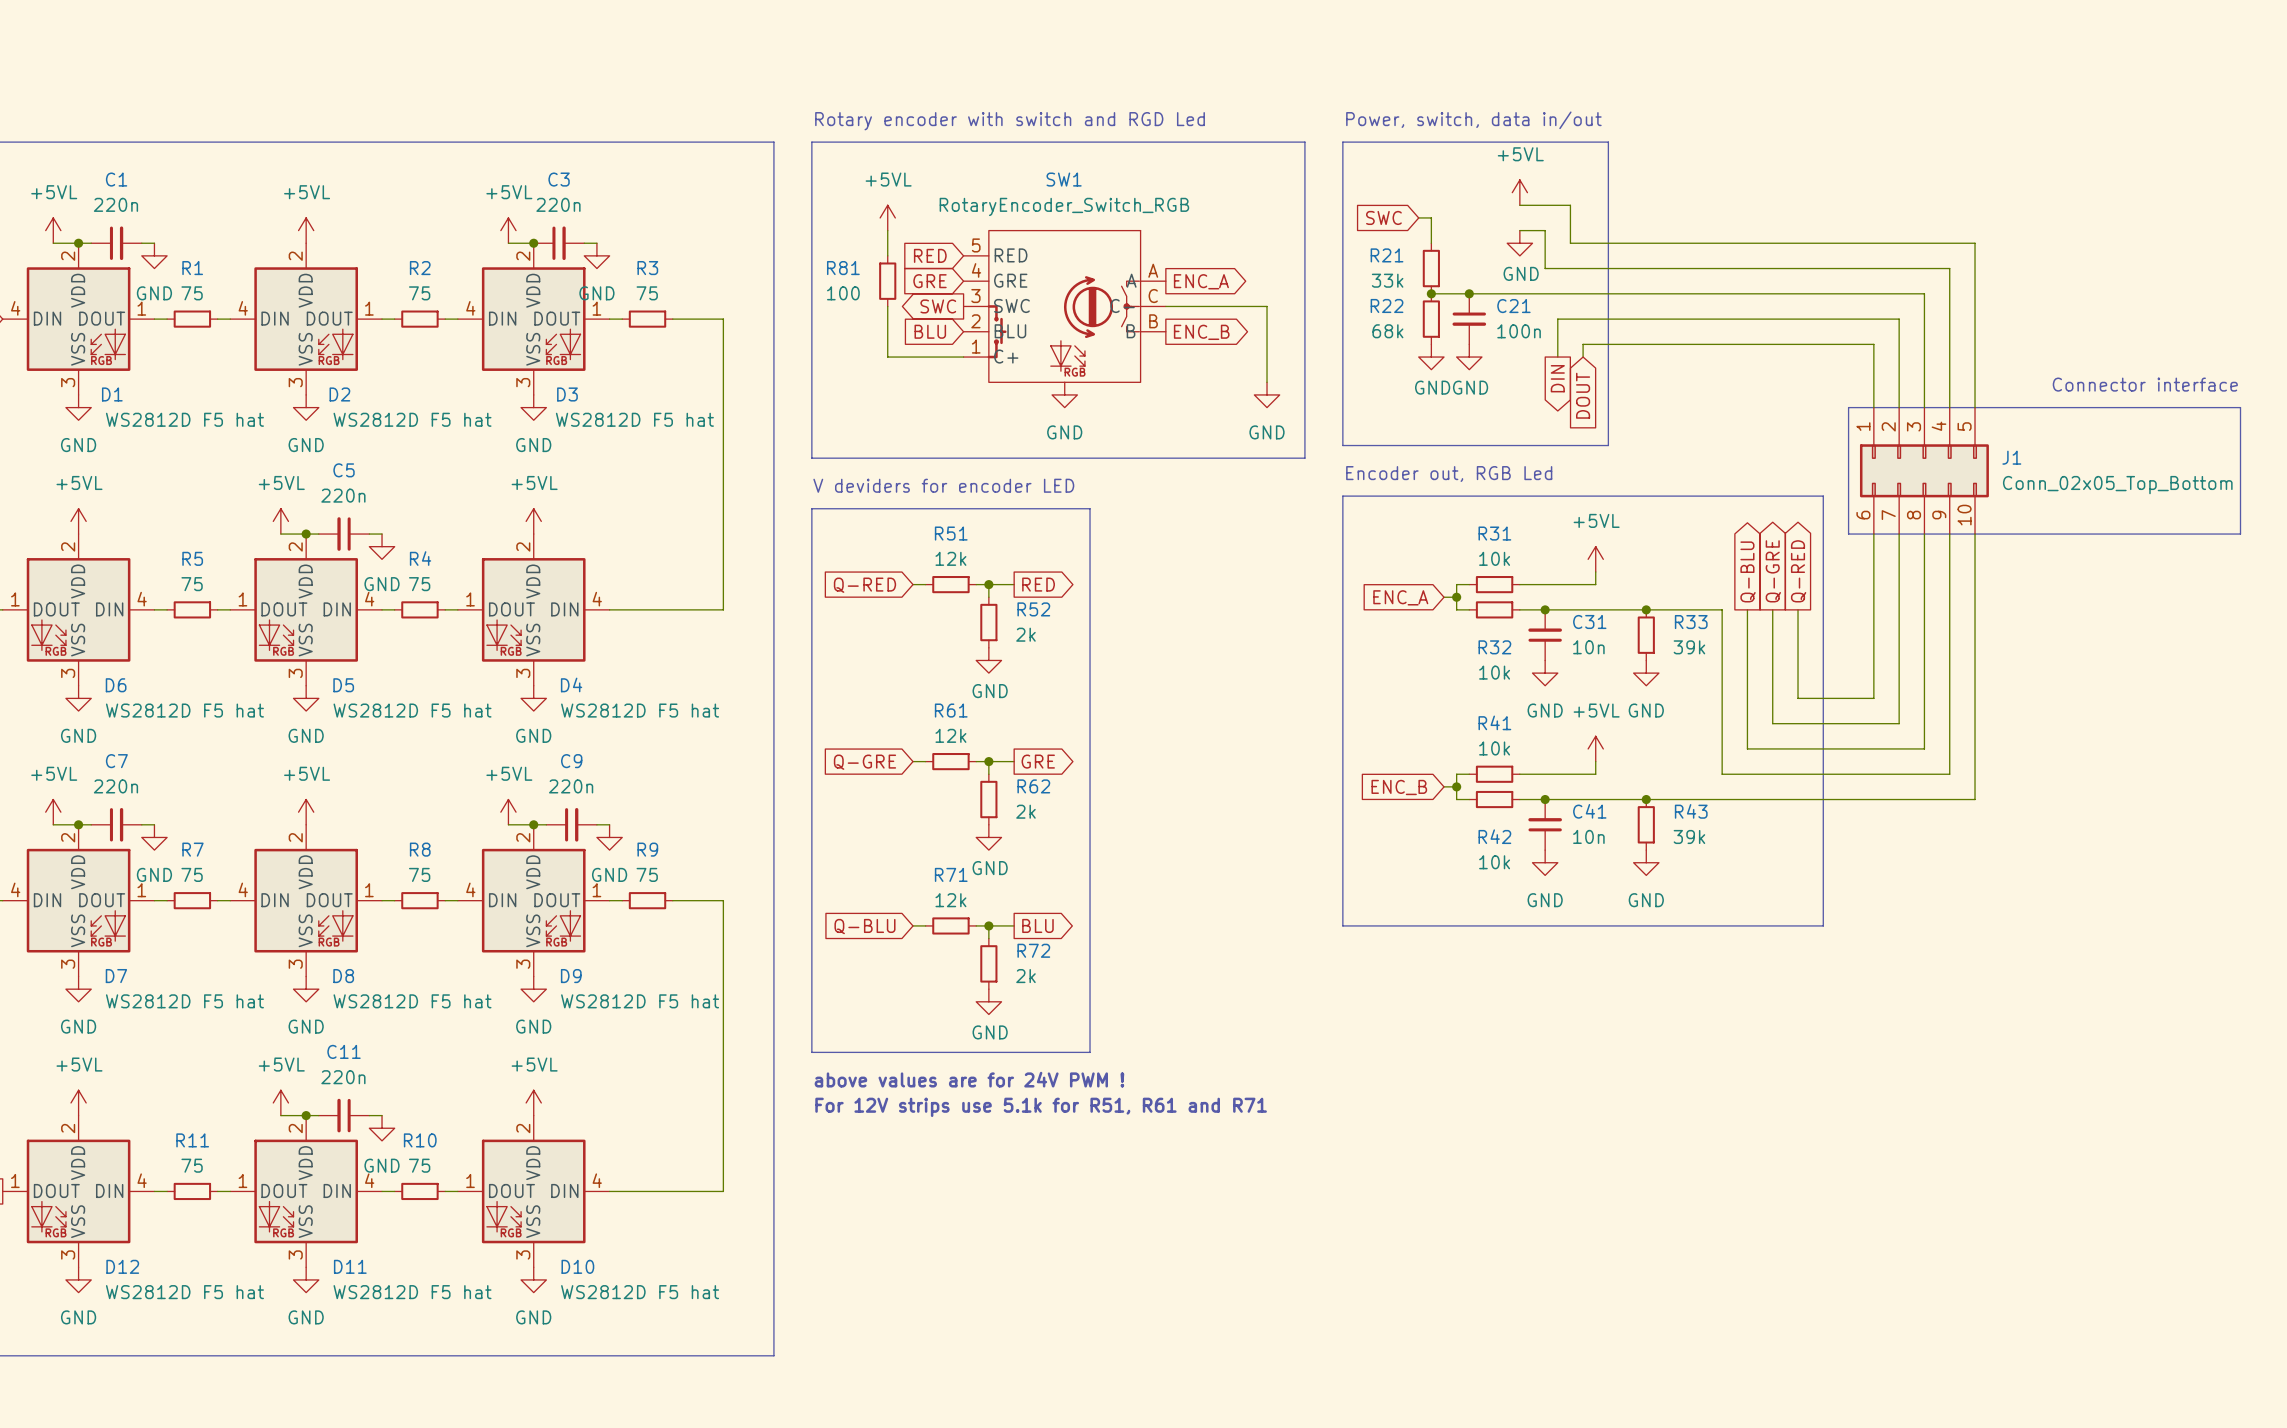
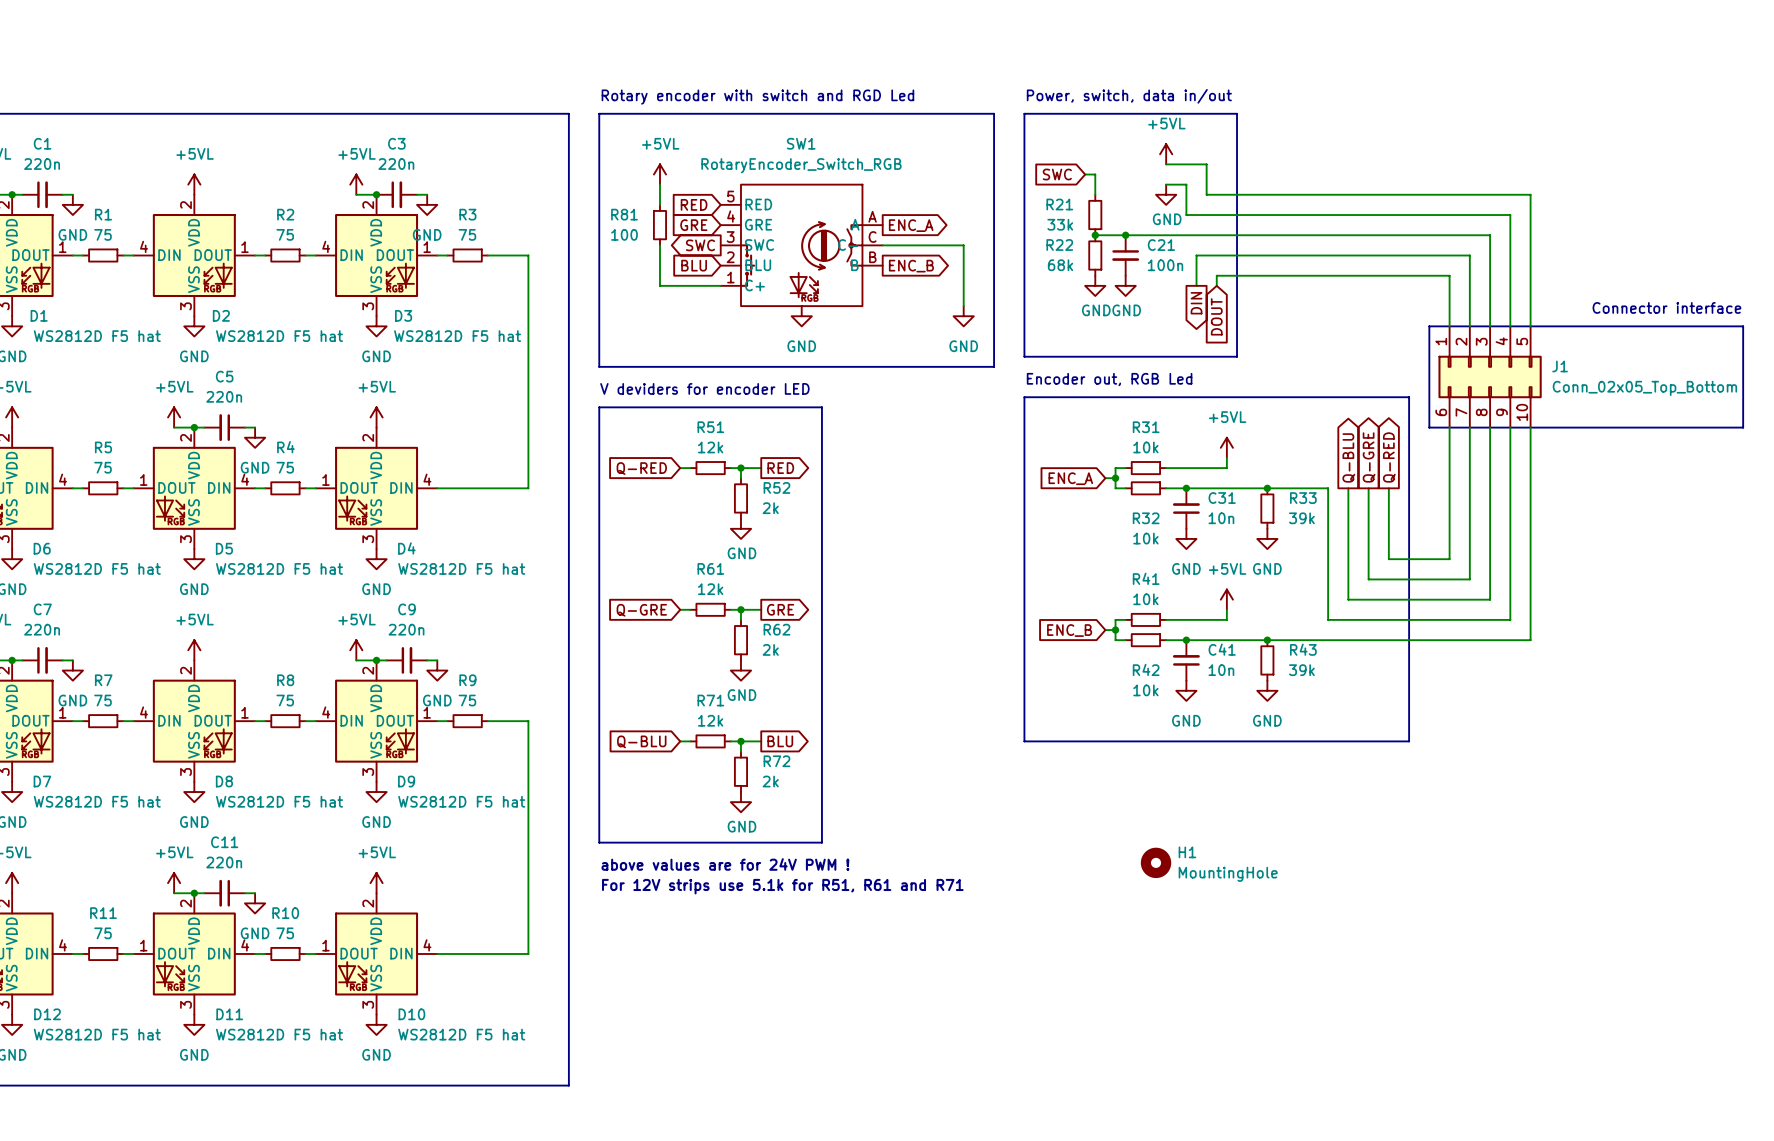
H1: none -> MountingHole (1156, 862)

